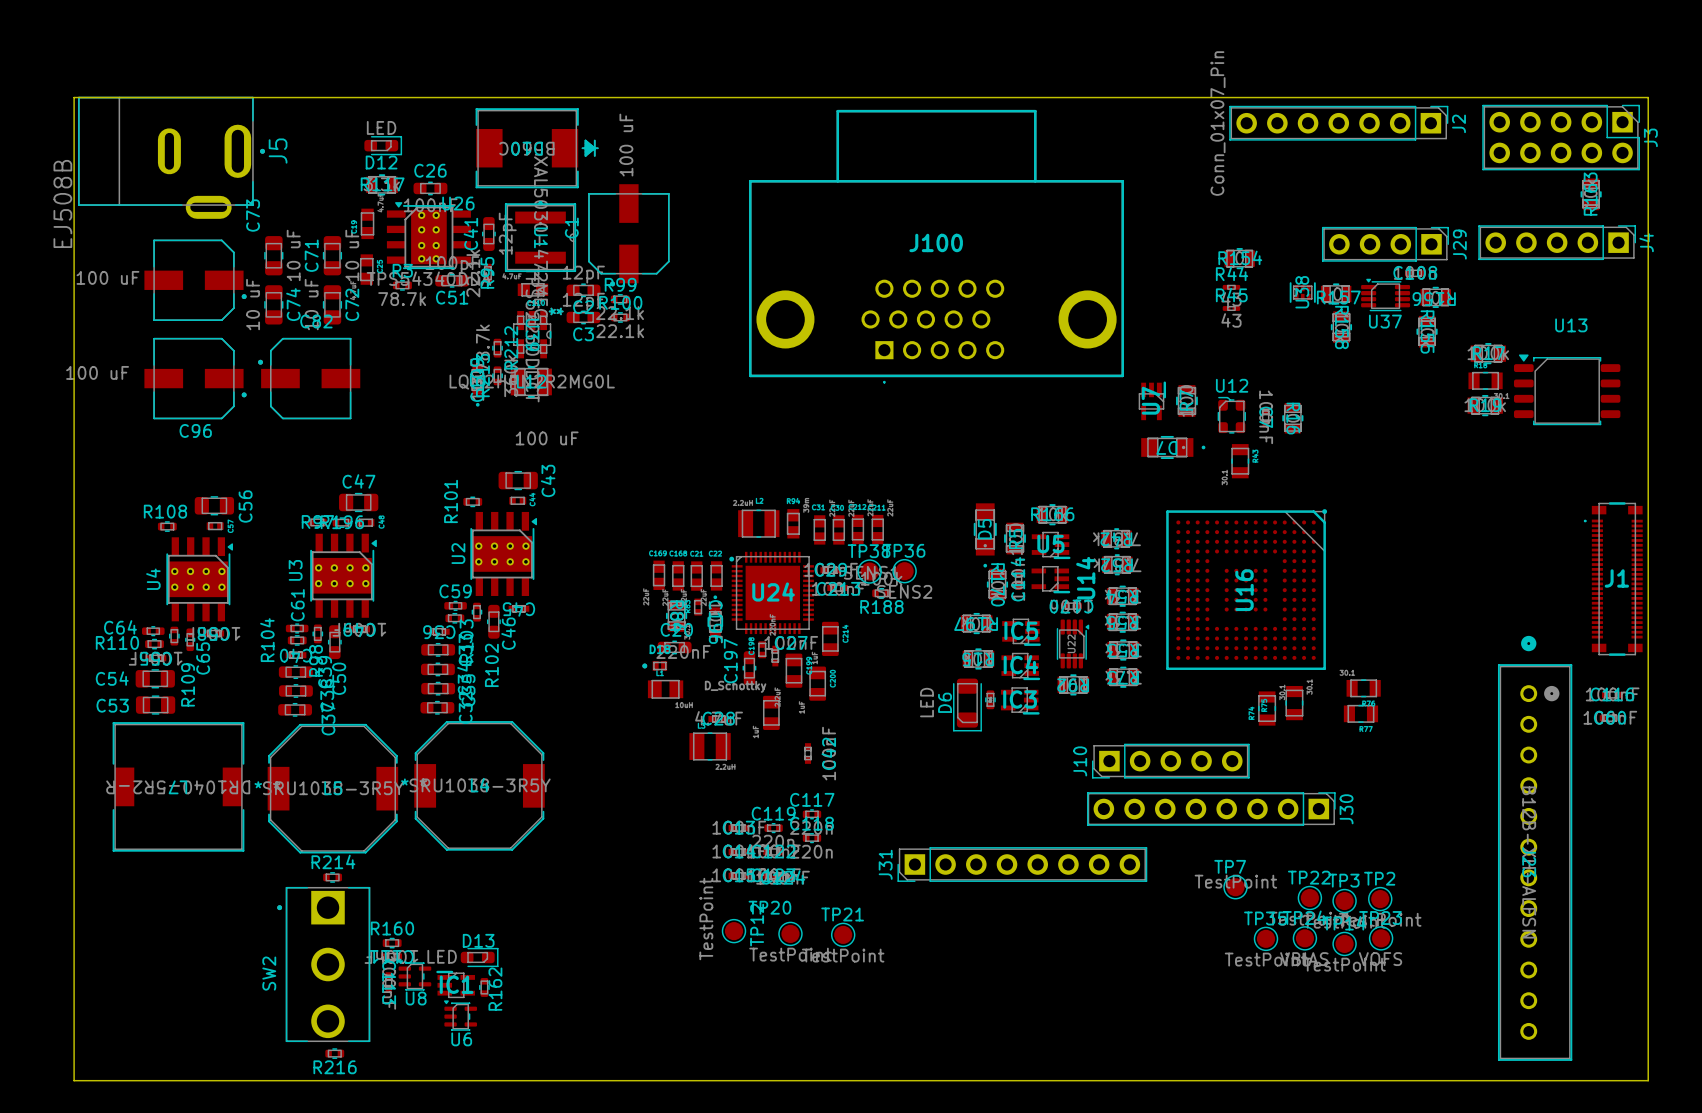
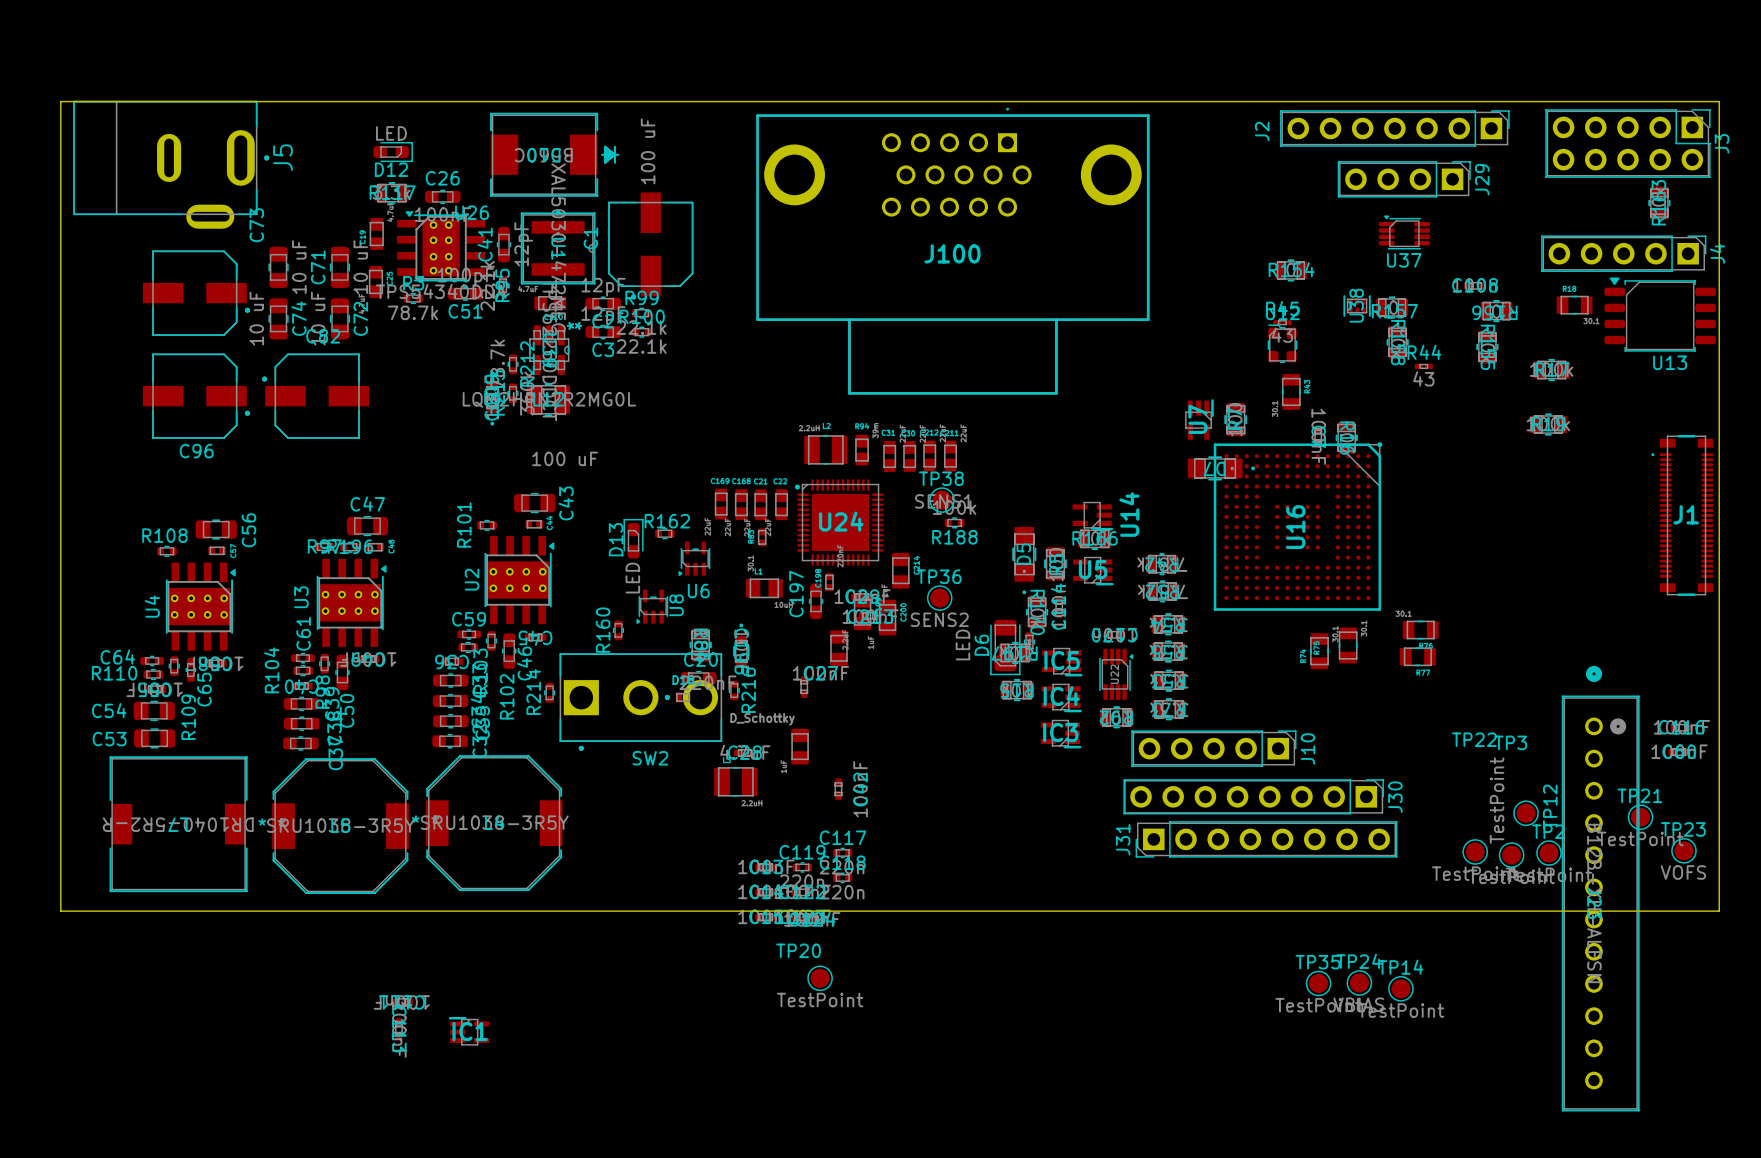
board edge: (74, 97) (74, 1080) (1648, 1080) (1648, 869) -> (69, 101) (60, 101) (60, 911) (1719, 911)
J2 value: Conn_01x07_Pin (1217, 123) -> none
J2 name position: J2 (1458, 123) -> J2 (1262, 131)
J5 value: EJ508B (62, 203) -> none
J29 position: (1385, 244) -> (1404, 179)
J100 rotation: 0° (936, 246) -> 180° (952, 251)
part value: 100 uF (107, 277) -> none
R44 position: (1231, 287) -> (1423, 366)
U37 position: (1385, 294) -> (1404, 232)
U13 name position: U13 (1571, 325) -> U13 (1670, 362)
C96 value: 100 uF (97, 372) -> none
part position: (1485, 380) -> (1574, 305)
U13 position: (1567, 389) -> (1660, 314)
U12 position: (1231, 415) -> (1282, 343)
part position: (1240, 461) -> (1291, 391)
part position: (758, 523) -> (825, 449)
part position: (793, 523) -> (862, 450)
part position: (819, 529) -> (889, 456)
part position: (838, 529) -> (909, 456)
part position: (857, 529) -> (929, 455)
part position: (877, 529) -> (950, 456)
TP38 position: (869, 571) -> (942, 500)
part position: (659, 575) -> (721, 504)
part position: (678, 575) -> (741, 504)
part position: (716, 575) -> (781, 504)
part position: (696, 576) -> (760, 504)
U14 position: (1050, 579) -> (1092, 516)
J1 position: (1613, 579) -> (1682, 515)
U16 position: (1246, 589) -> (1298, 526)
U24 position: (771, 592) -> (839, 522)
R188 position: (881, 593) -> (954, 522)
part position: (698, 607) -> (762, 537)
part: none -> (838, 648)
part position: (830, 638) -> (900, 570)
part position: (762, 649) -> (829, 582)
C197 position: (749, 668) -> (816, 601)
part position: (793, 670) -> (862, 612)
part position: (817, 683) -> (887, 617)
part position: (1363, 688) -> (1420, 630)
part position: (665, 689) -> (764, 588)
part position: (990, 699) -> (1029, 642)
part position: (1294, 703) -> (1348, 645)
D6 position: (967, 705) -> (1005, 647)
part position: (1267, 708) -> (1319, 651)
part position: (1360, 713) -> (1417, 656)
J10 rotation: 0° (1170, 761) -> 180° (1213, 748)
J30 position: (1211, 809) -> (1253, 796)
J31 position: (1022, 864) -> (1266, 839)
R214 rotation: 0° (332, 877) -> 90° clockwise (549, 692)
R214 position: (332, 877) -> (549, 692)
TP22 name position: TP22 (1309, 877) -> TP22 (1474, 739)
TP3 name position: TP3 (1344, 880) -> TP3 (1510, 742)
TP7: TestPoint (1235, 887) -> none
TP22 position: (1309, 897) -> (1475, 851)
TP2 position: (1380, 899) -> (1548, 853)
TP3 position: (1344, 901) -> (1511, 855)
TP12 position: (734, 931) -> (1526, 813)
TP21 position: (843, 934) -> (1640, 817)
TP23 position: (1381, 938) -> (1683, 850)
R160 rotation: 0° (392, 943) -> 90° clockwise (618, 630)
R160 position: (392, 943) -> (618, 630)
D13 rotation: 0° (479, 957) -> 90° counterclockwise (633, 538)
D13 position: (479, 957) -> (633, 538)
SW2 rotation: 0° (323, 964) -> 90° counterclockwise (640, 702)
SW2 position: (323, 964) -> (640, 702)
U8 rotation: 0° (414, 975) -> 90° counterclockwise (652, 606)
U8 position: (414, 975) -> (652, 606)
R162 rotation: 0° (484, 987) -> 90° clockwise (664, 533)
R162 position: (484, 987) -> (664, 533)
U6 rotation: 0° (460, 1015) -> 90° counterclockwise (694, 558)
U6 position: (460, 1015) -> (694, 558)
R216 rotation: 0° (334, 1053) -> 90° clockwise (734, 690)
R216 position: (334, 1053) -> (734, 690)

